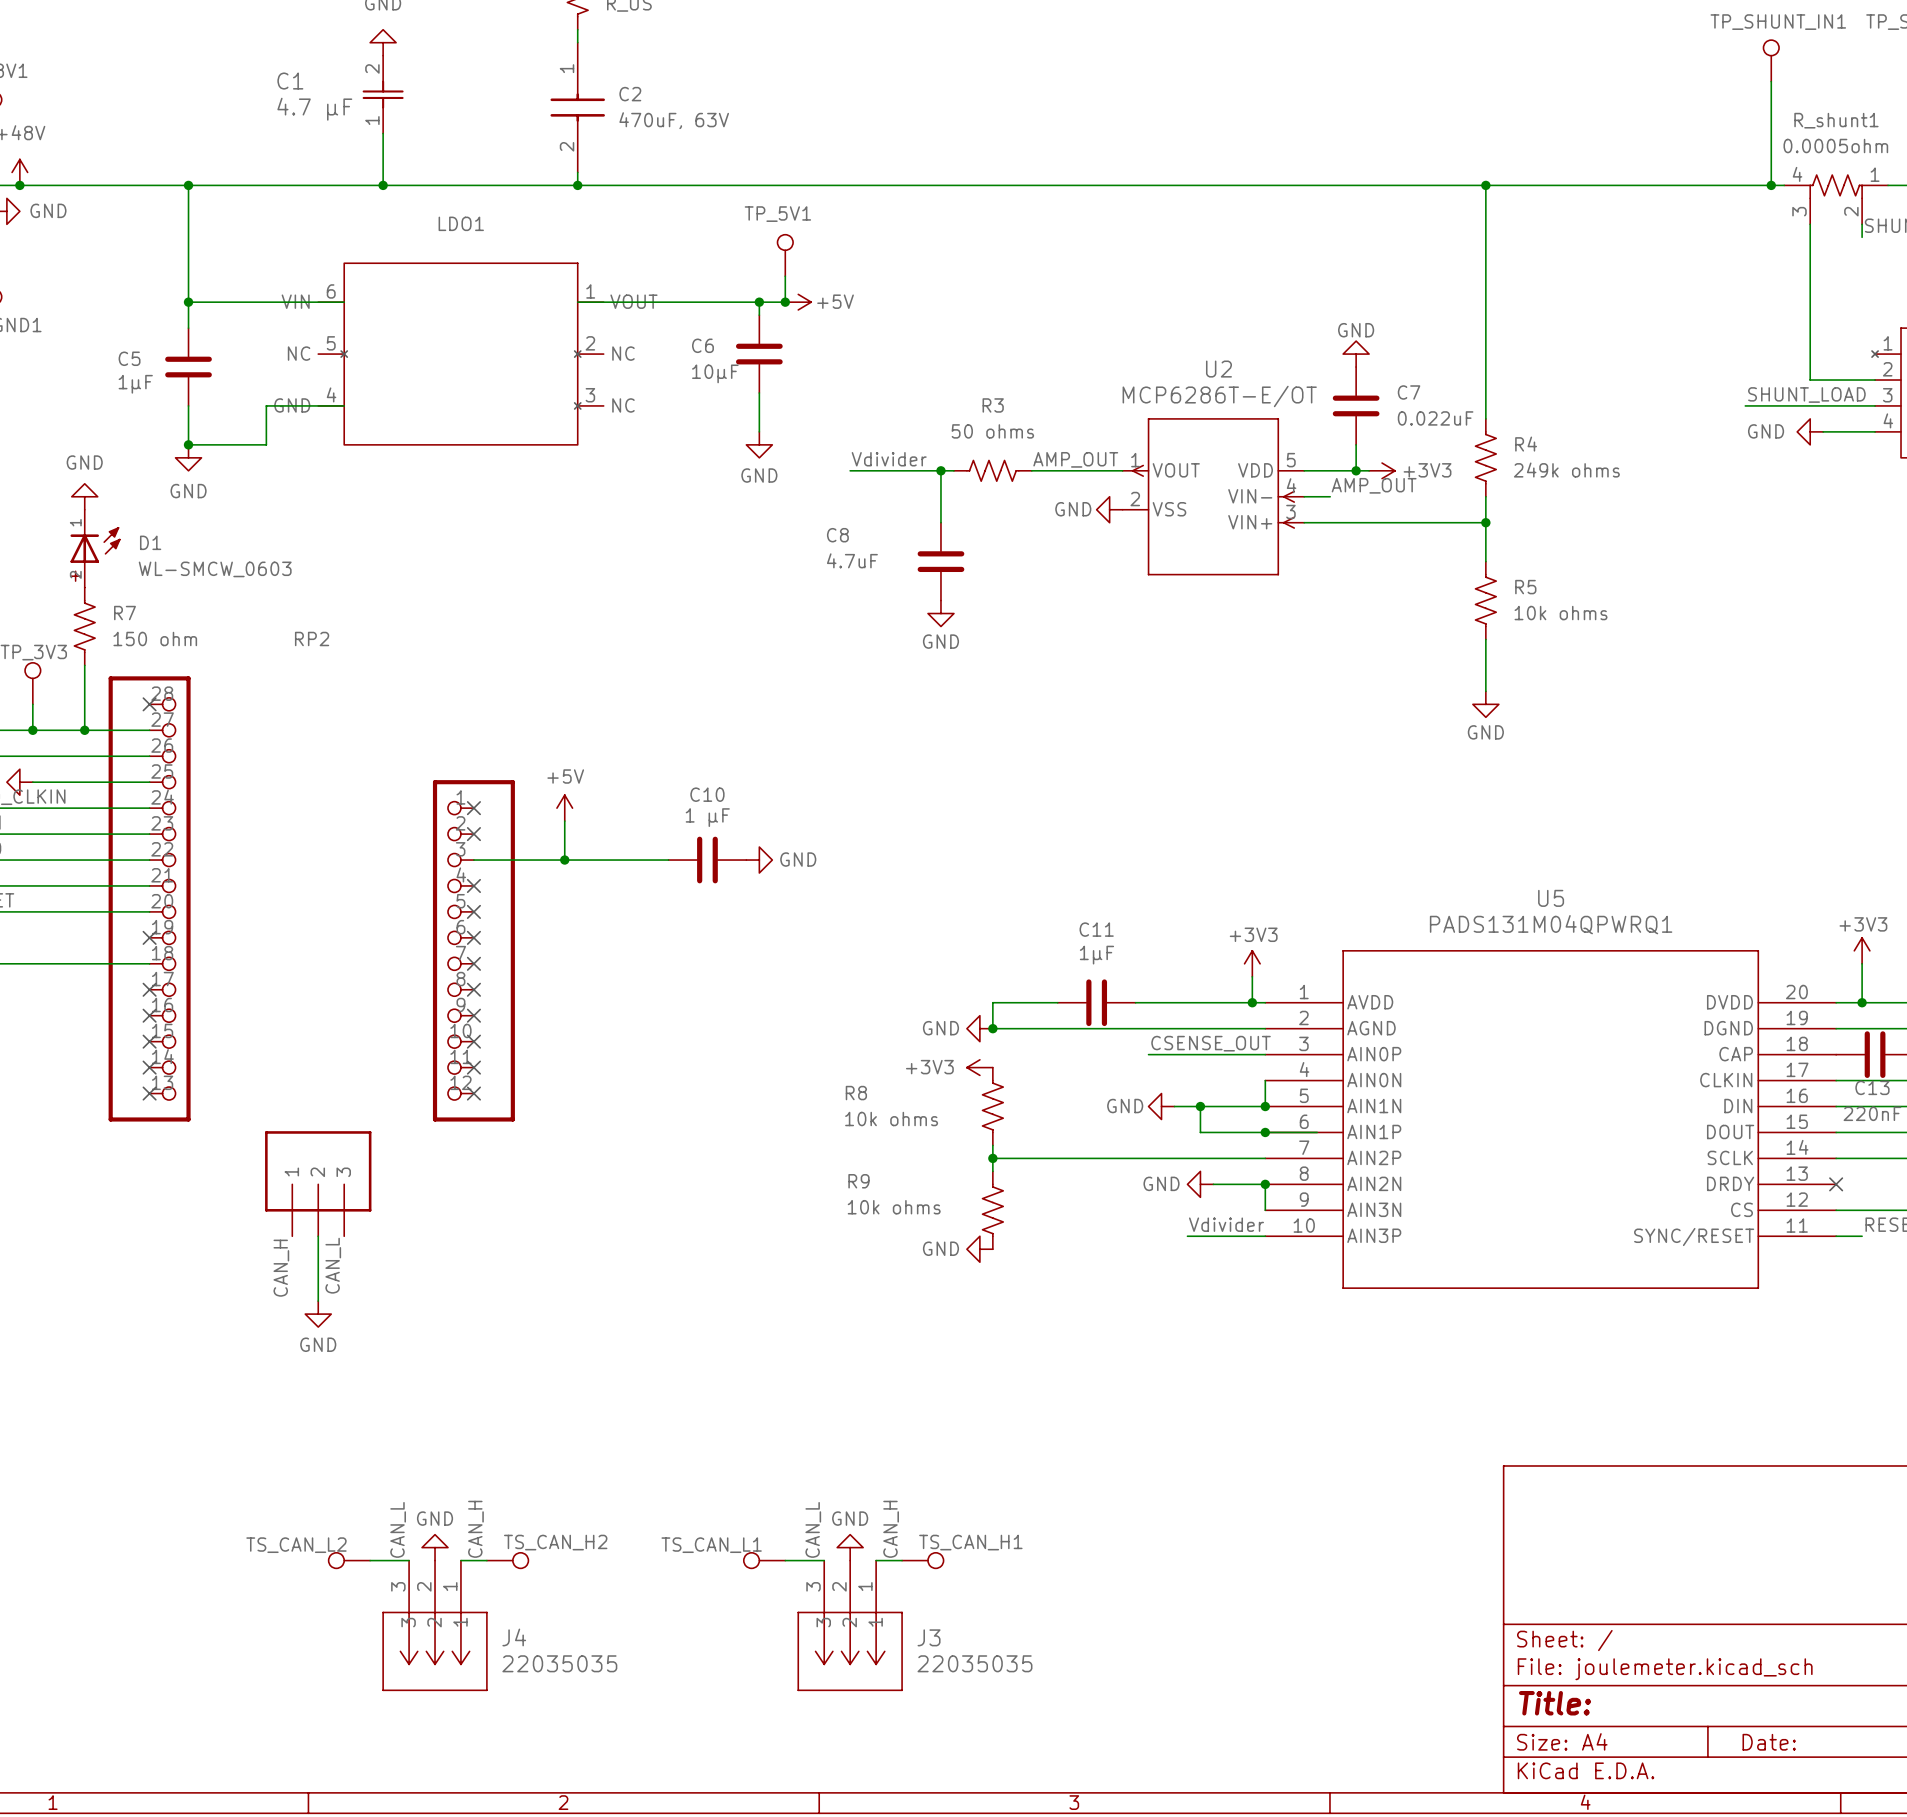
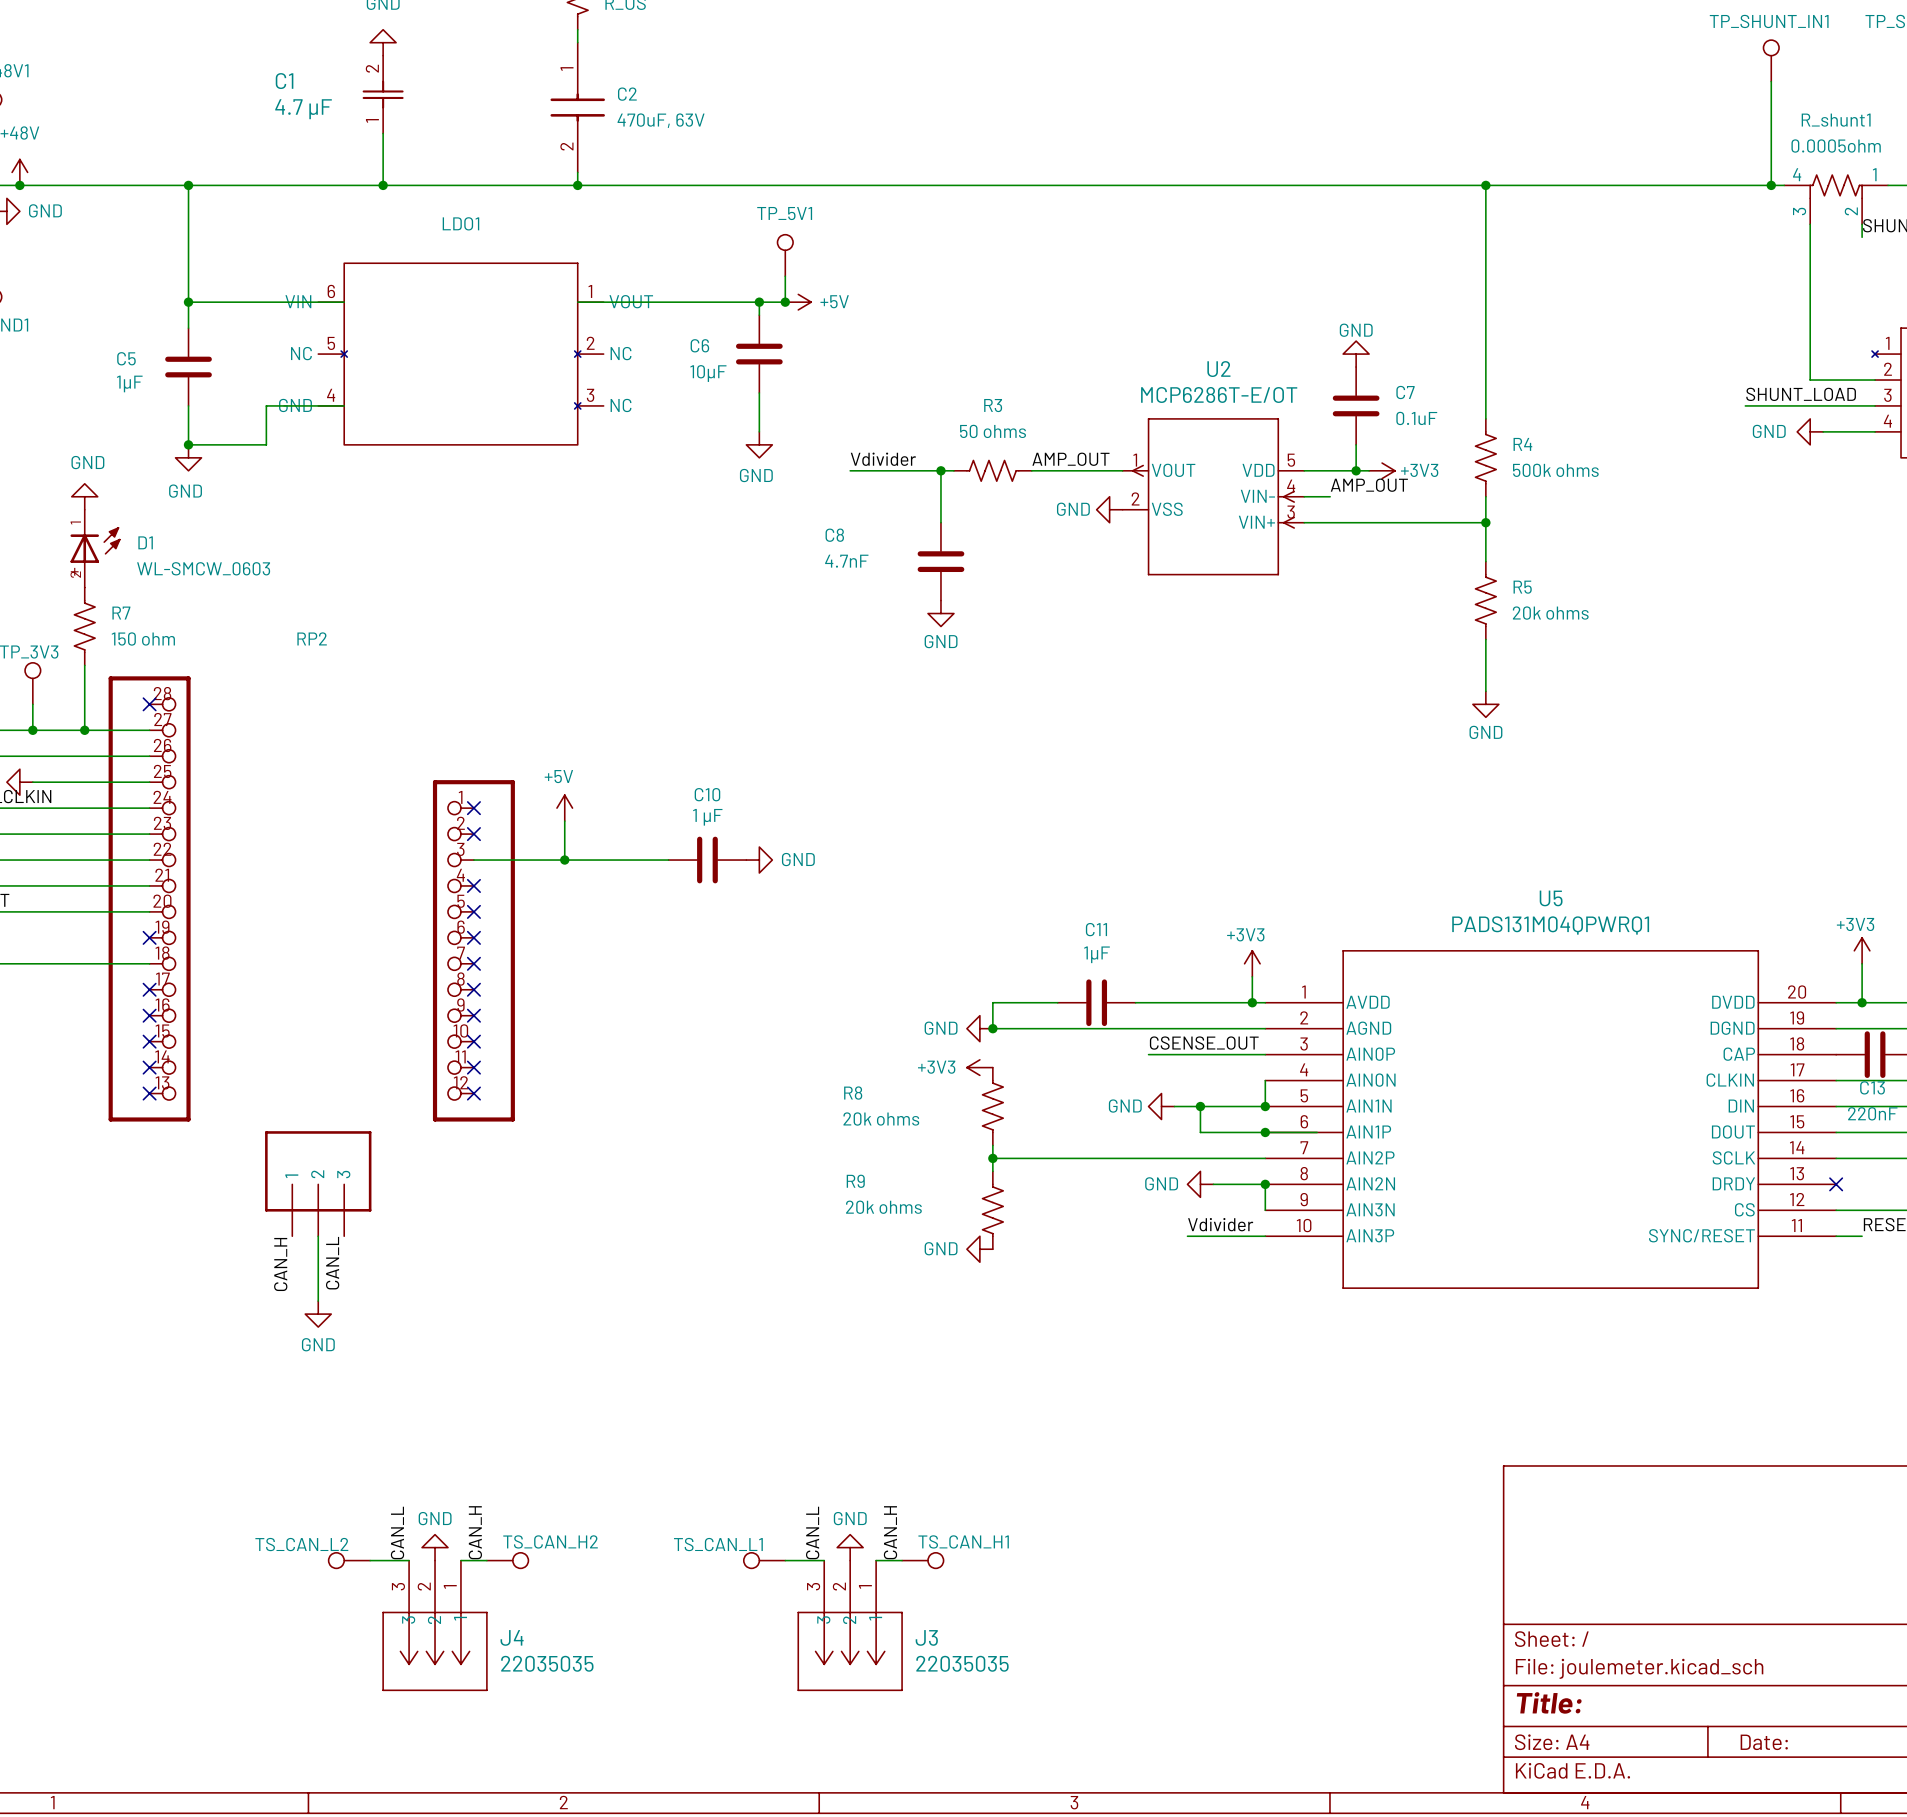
C7 value: 0.022uF (1435, 418) -> 0.1uF (1416, 418)
R4 value: 249k ohms (1566, 470) -> 500k ohms (1555, 470)
C8 value: 4.7uF (852, 560) -> 4.7nF (846, 561)
R5 value: 10k ohms (1561, 613) -> 20k ohms (1550, 613)
R8 value: 10k ohms (891, 1119) -> 20k ohms (881, 1119)
R9 value: 10k ohms (894, 1207) -> 20k ohms (883, 1207)

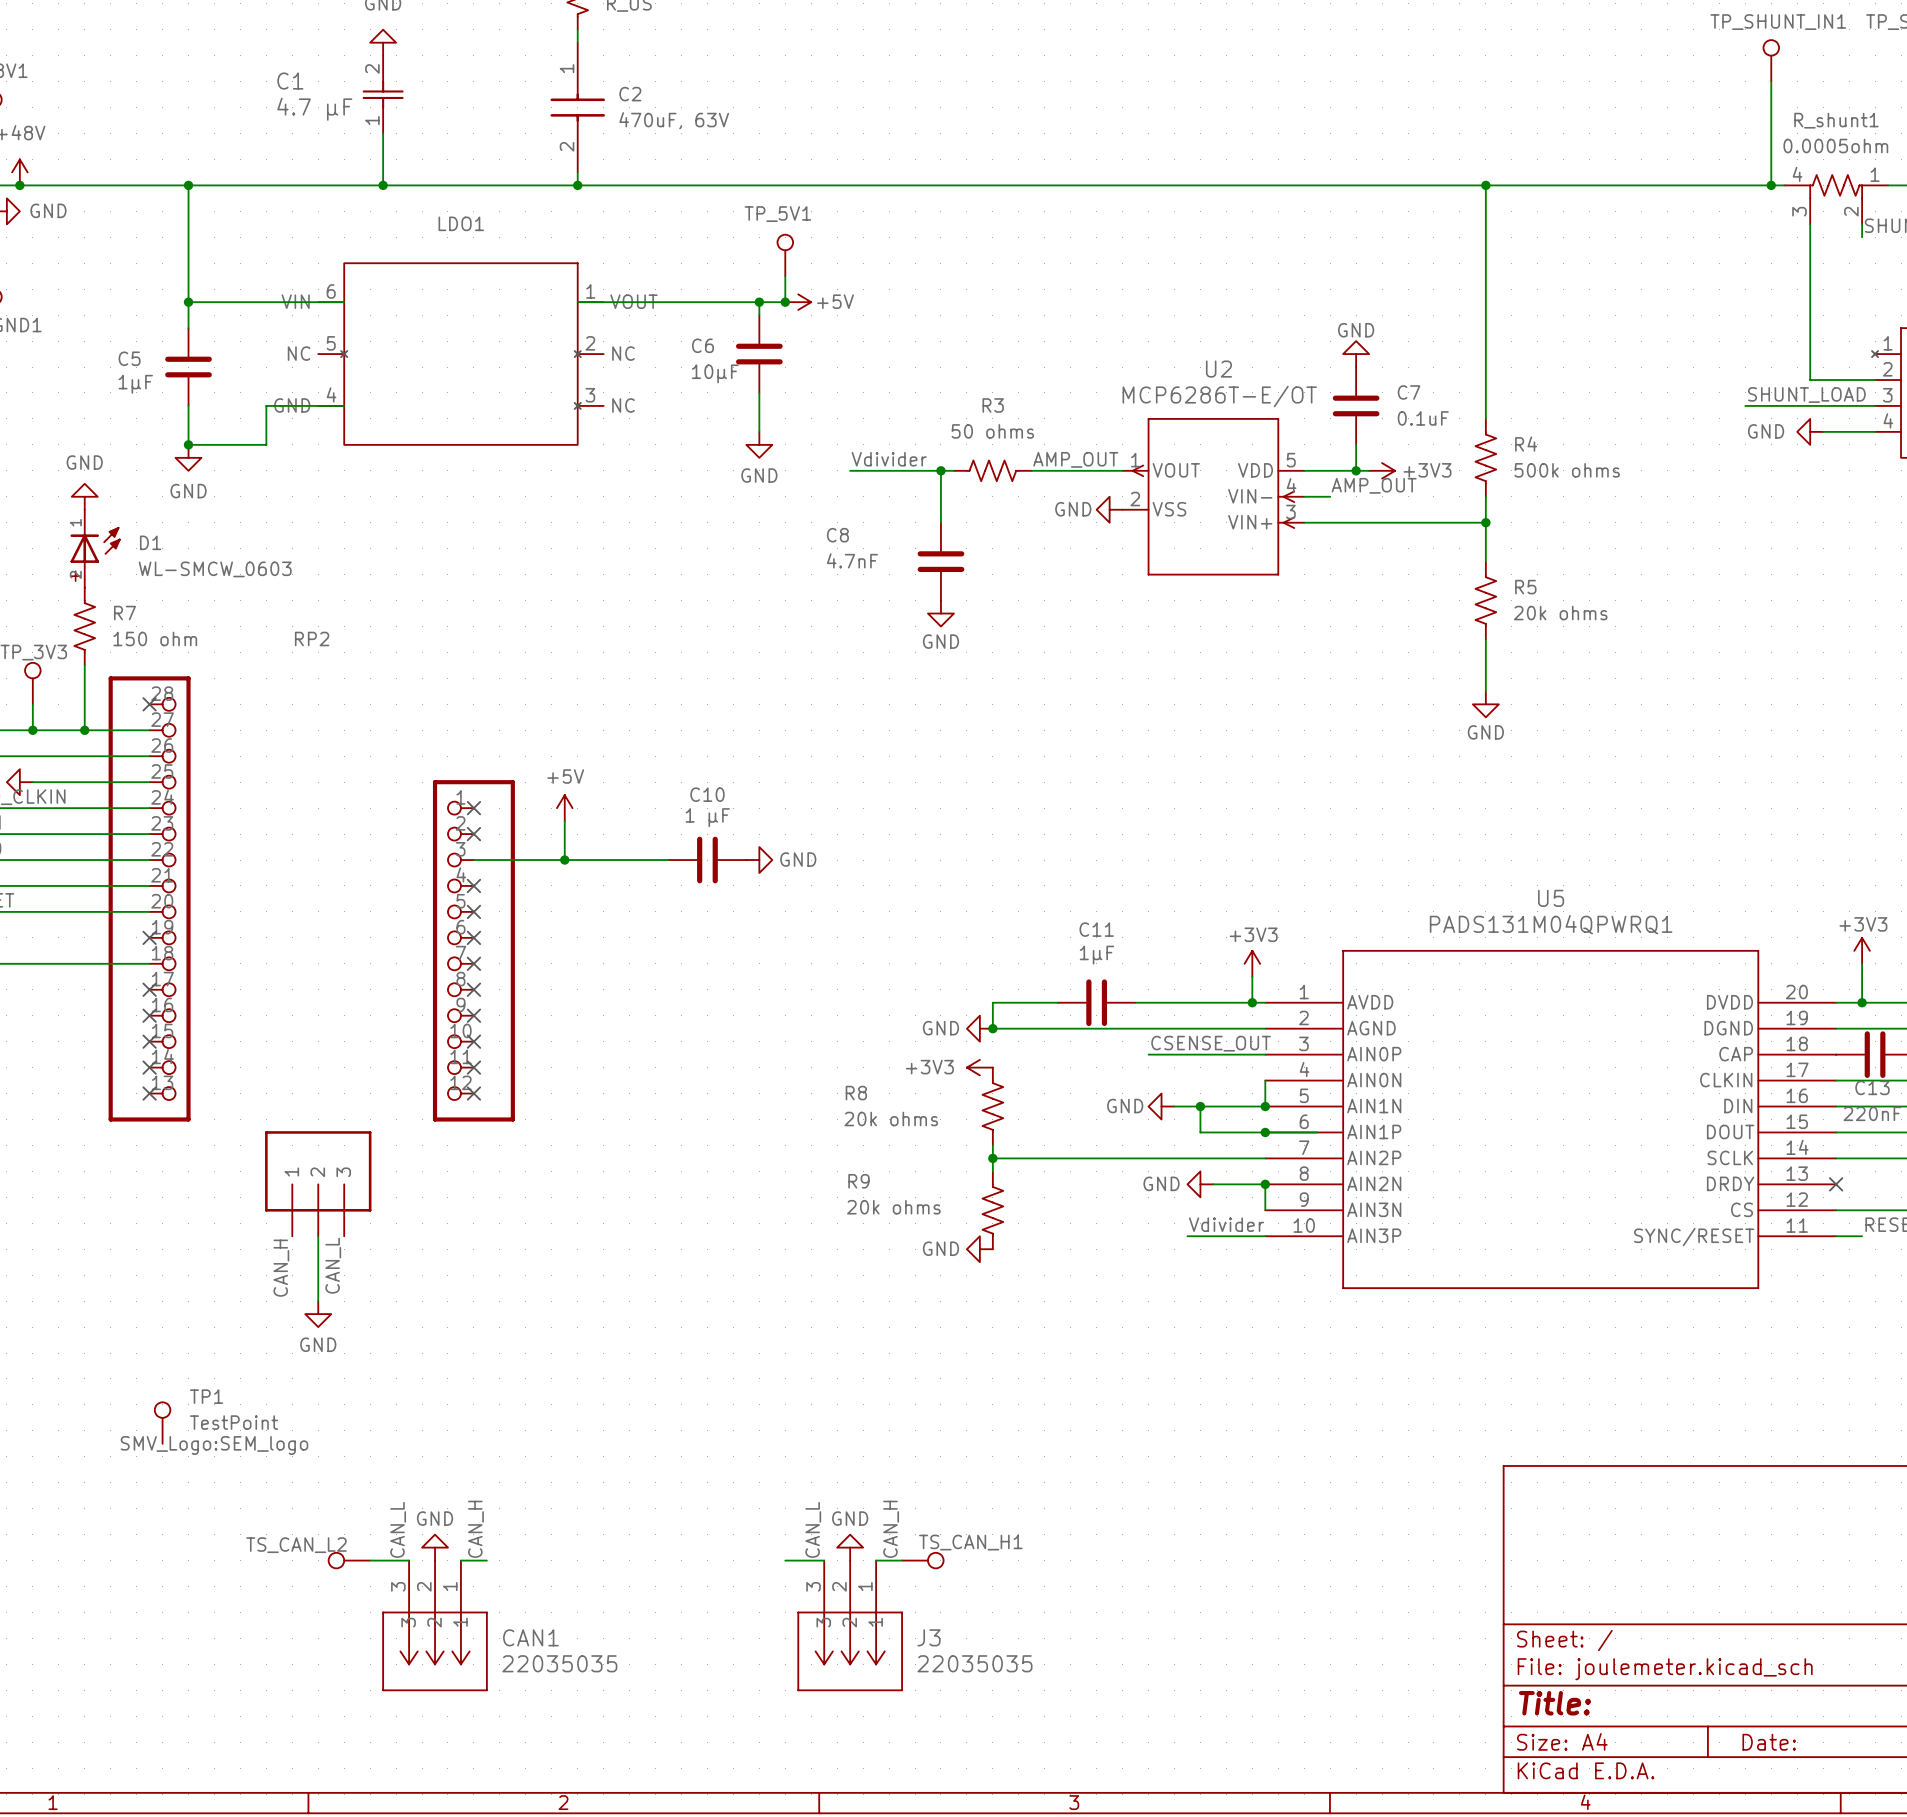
TP1: none -> TestPoint (162, 1423)
TS_CAN_H2: (507, 1560) -> none
TS_CAN_L1: (764, 1560) -> none
J4 name: J4 (512, 1637) -> CAN1 (530, 1637)

